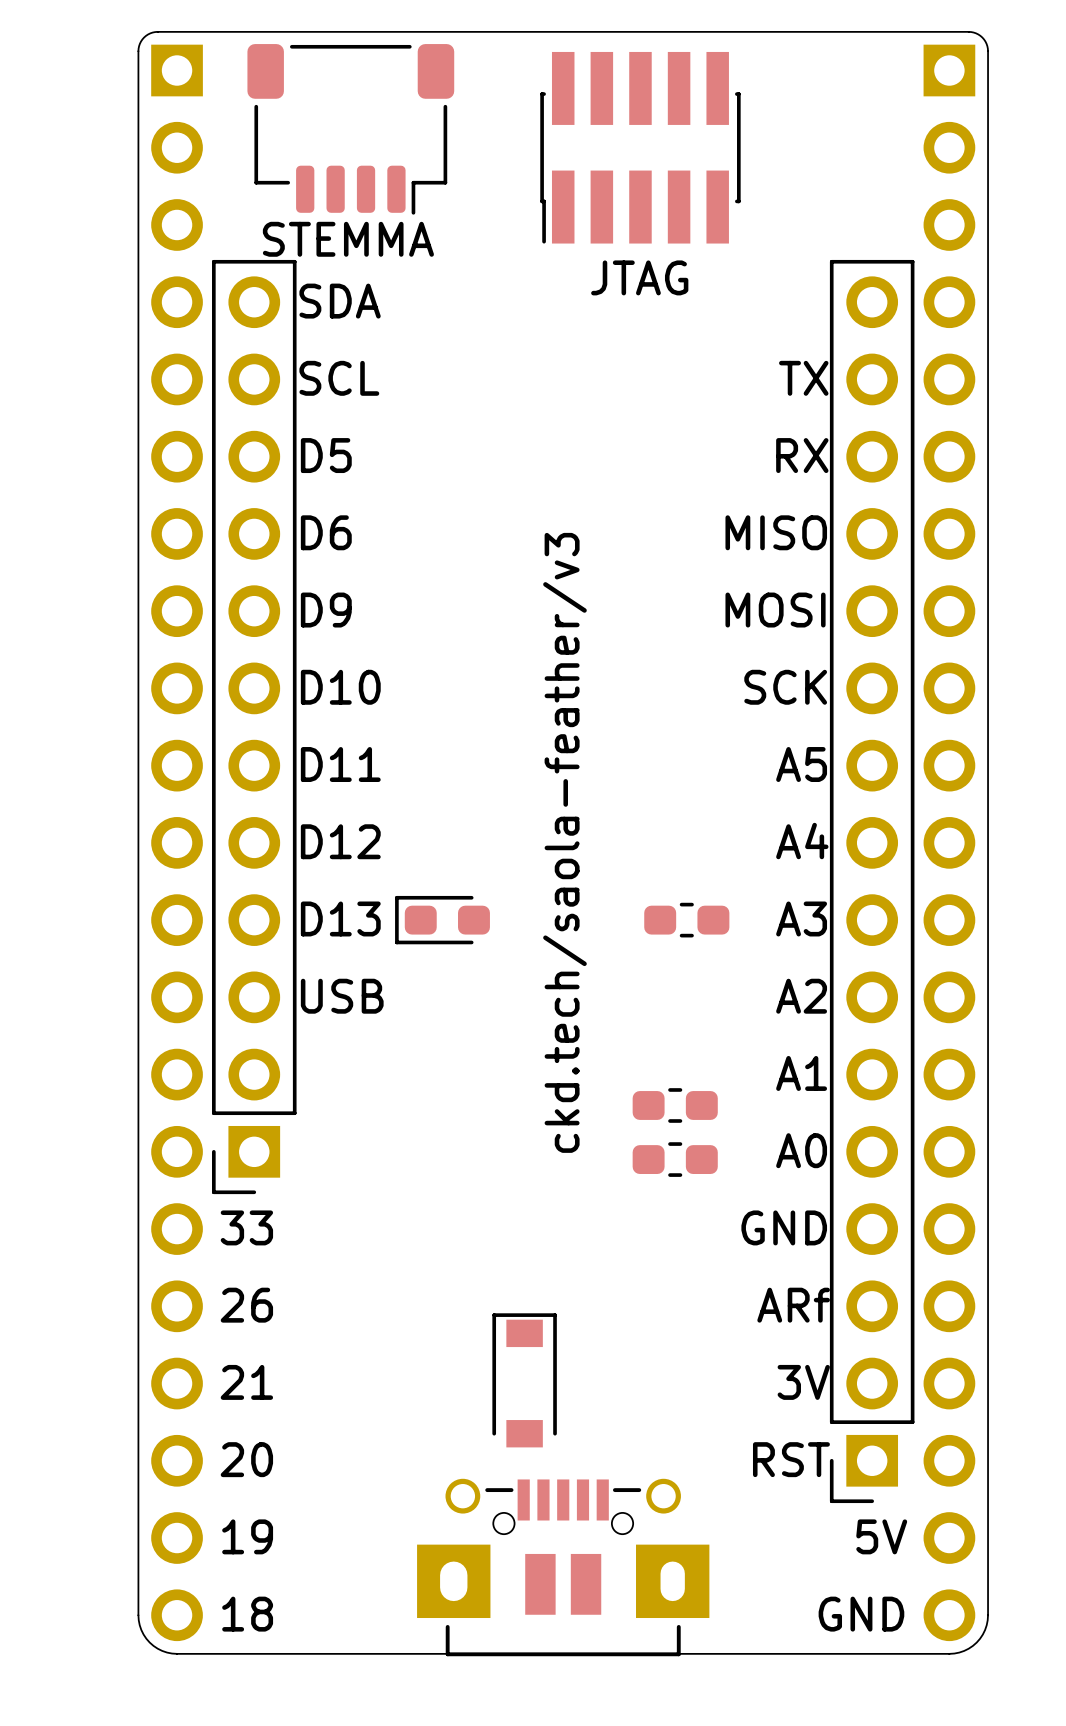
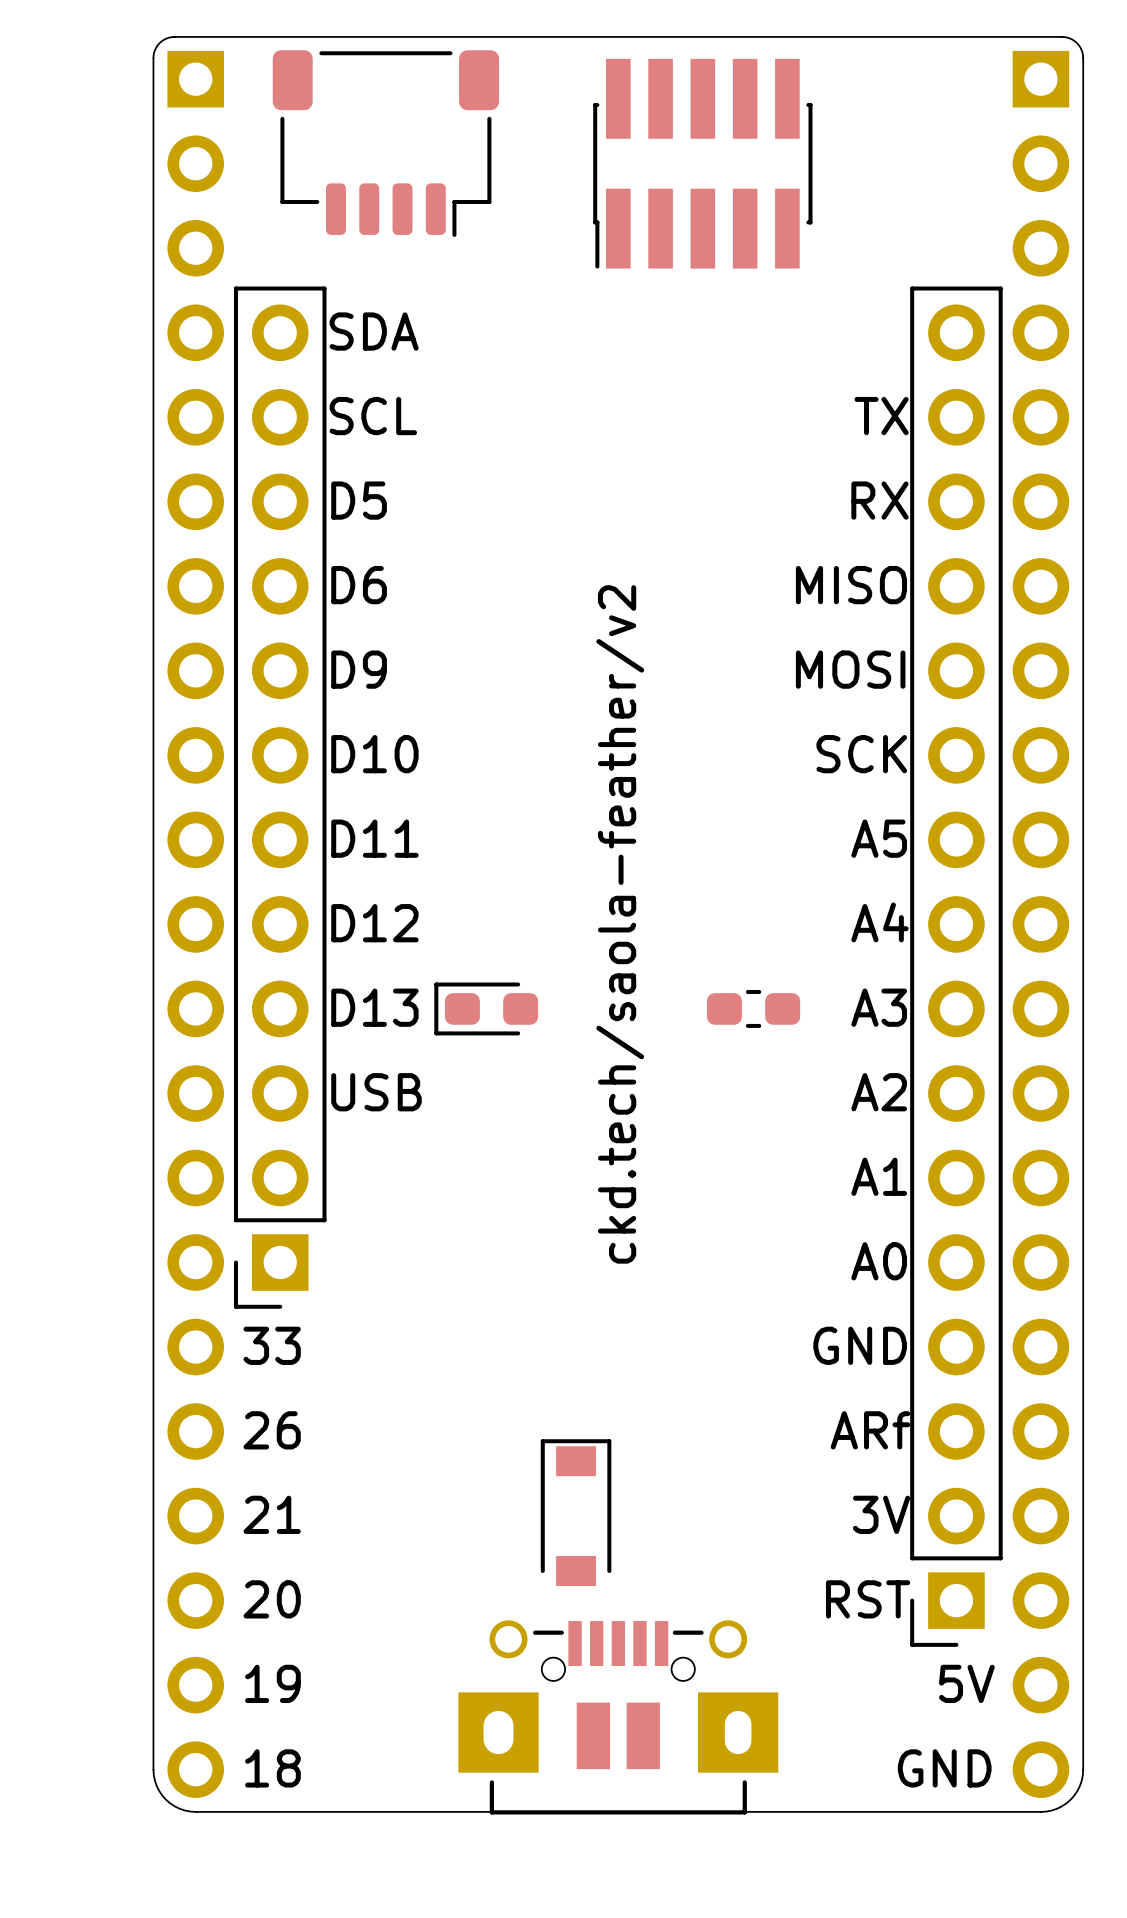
text: STEMMA (348, 239) -> none
text: JTAG (639, 277) -> none
text: ckd.tech/saola-feather/v3 (564, 842) -> ckd.tech/saola-feather/v2 (620, 924)
part: (675, 1105) -> none
part: (675, 1159) -> none

